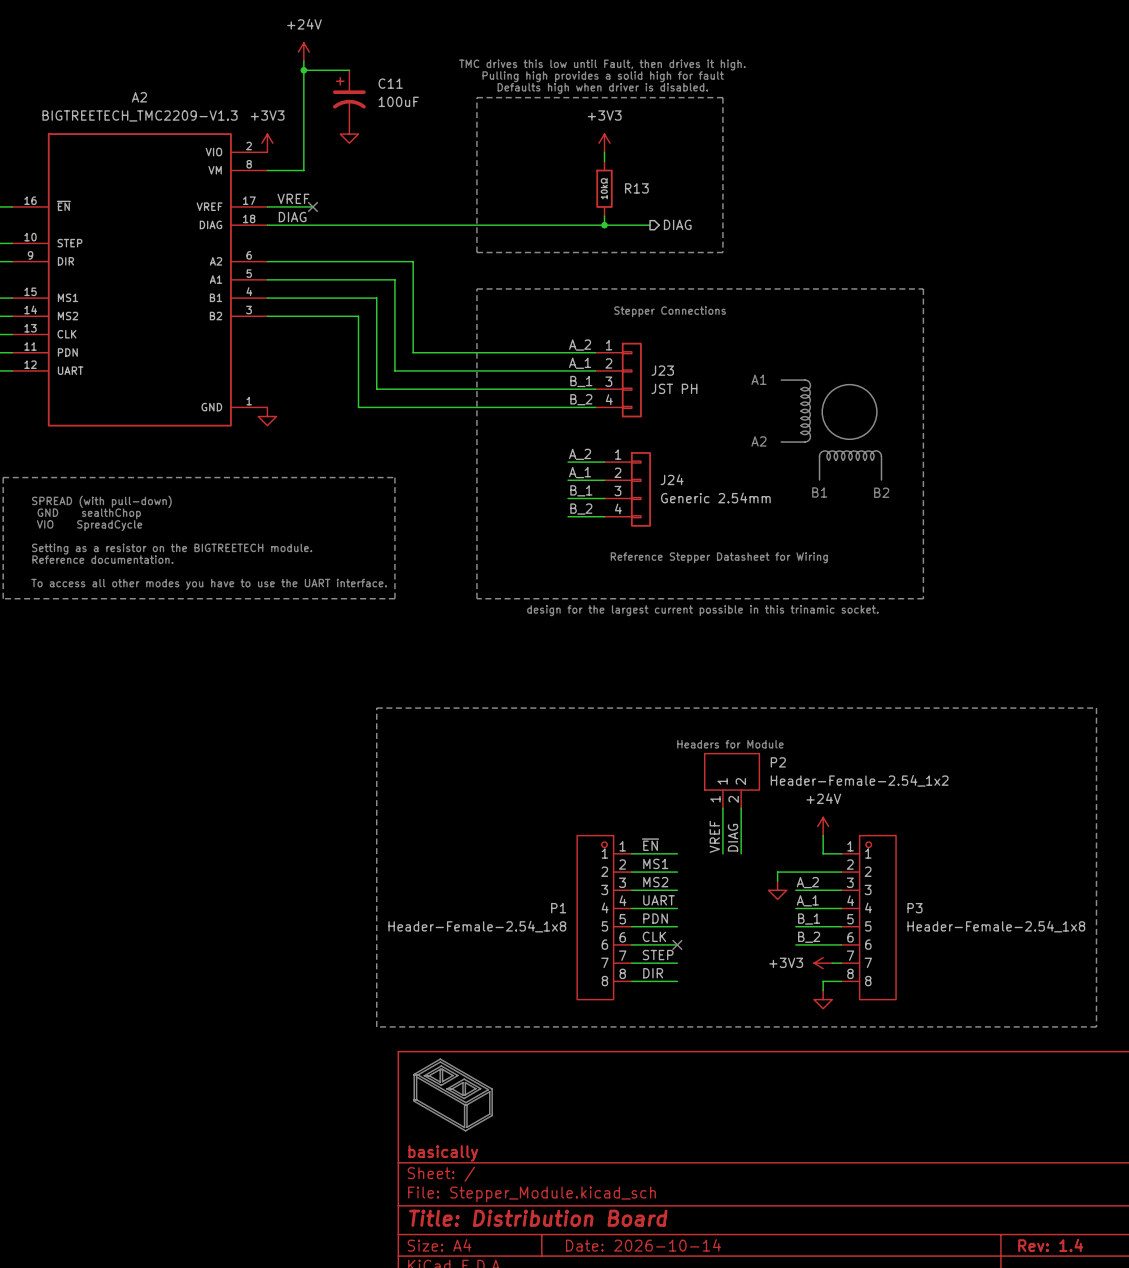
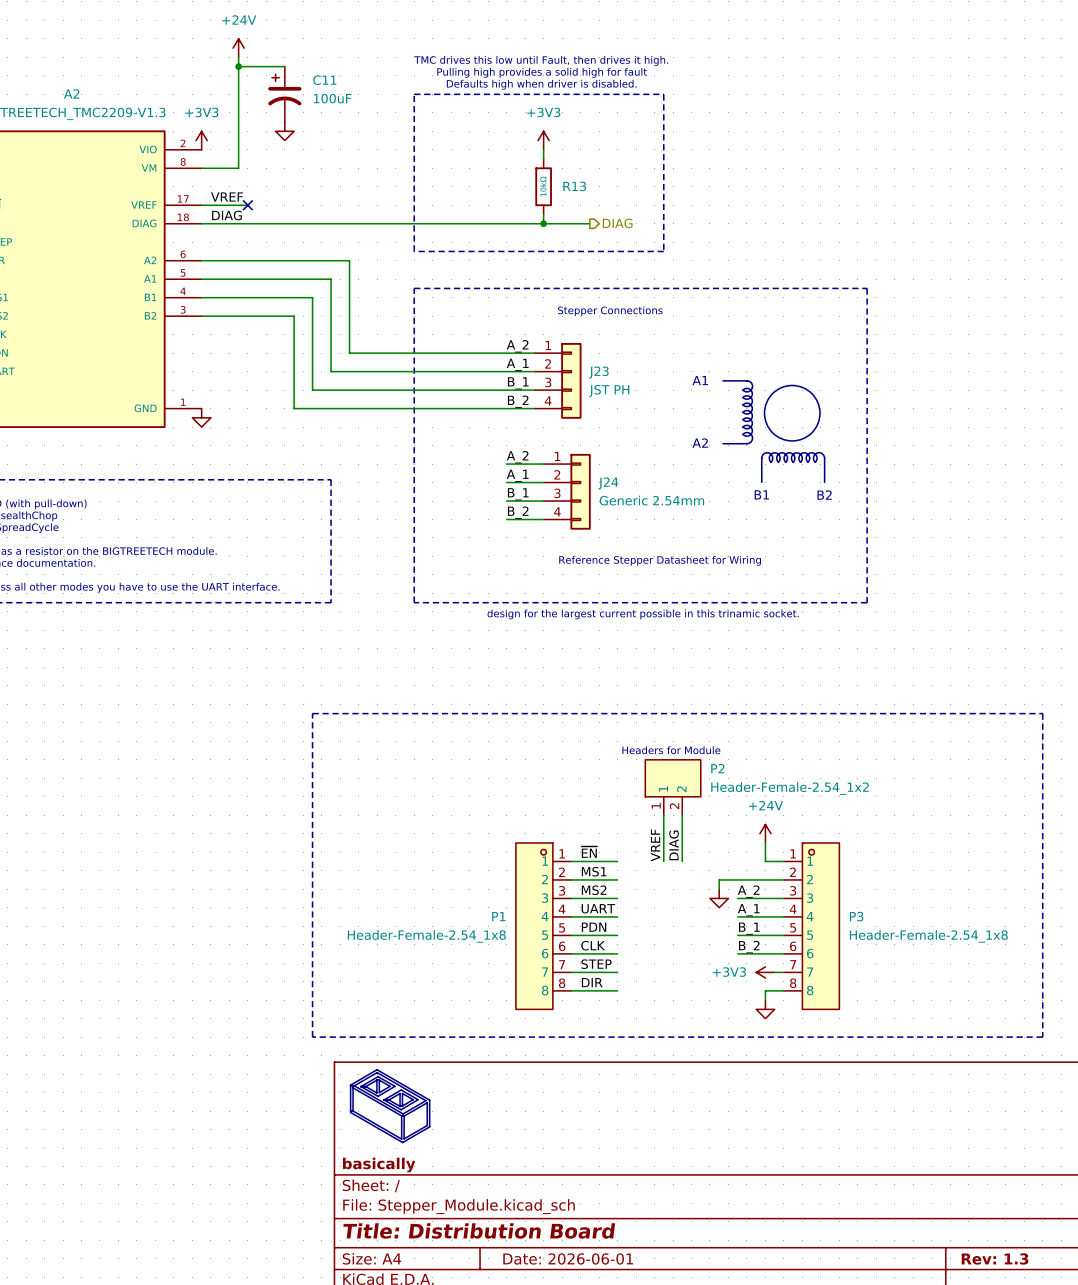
no-connect mark: (677, 944) -> none
title block: Date: 2026-10-14 (643, 1245) -> Date: 2026-06-01 (568, 1258)
title block: Rev: 1.4 (1050, 1245) -> Rev: 1.3 (995, 1258)

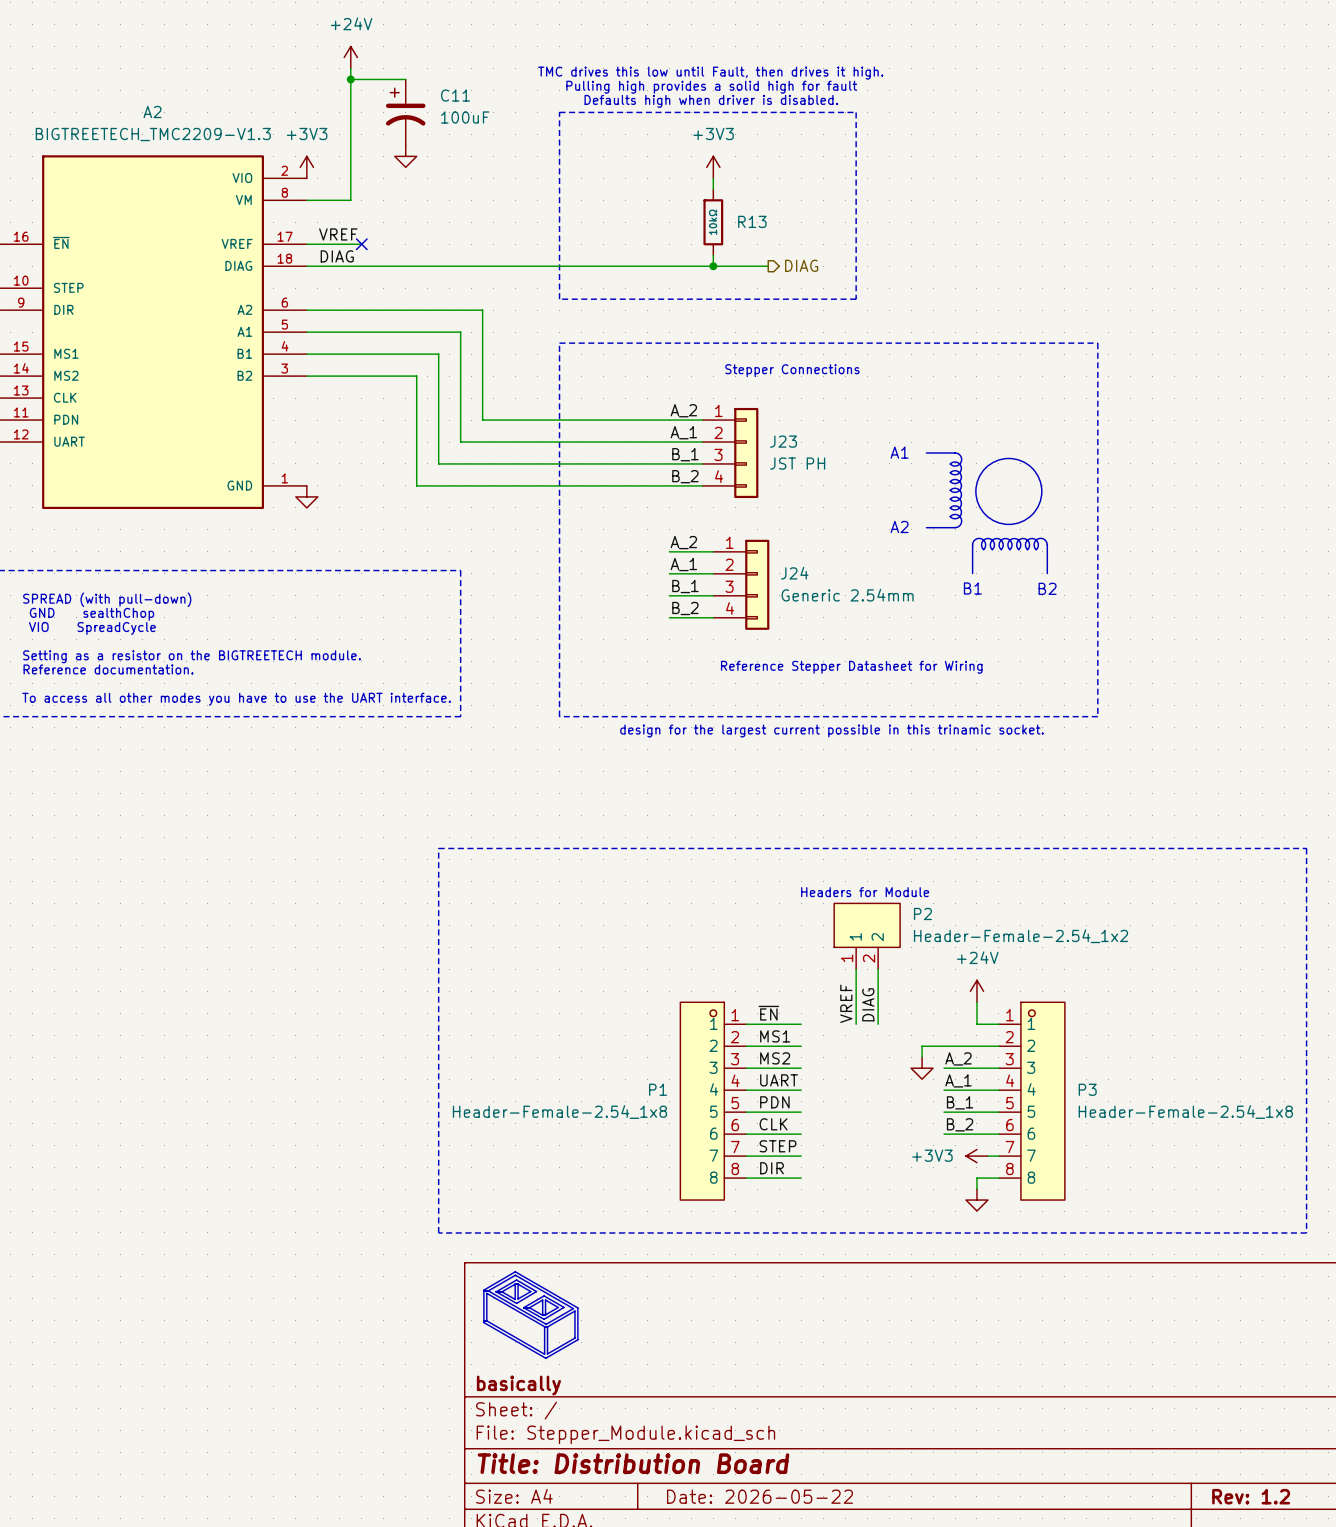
title block: Date: 2026-06-01 (568, 1258) -> Date: 2026-05-22 (760, 1496)
title block: Rev: 1.3 (995, 1258) -> Rev: 1.2 (1251, 1496)

